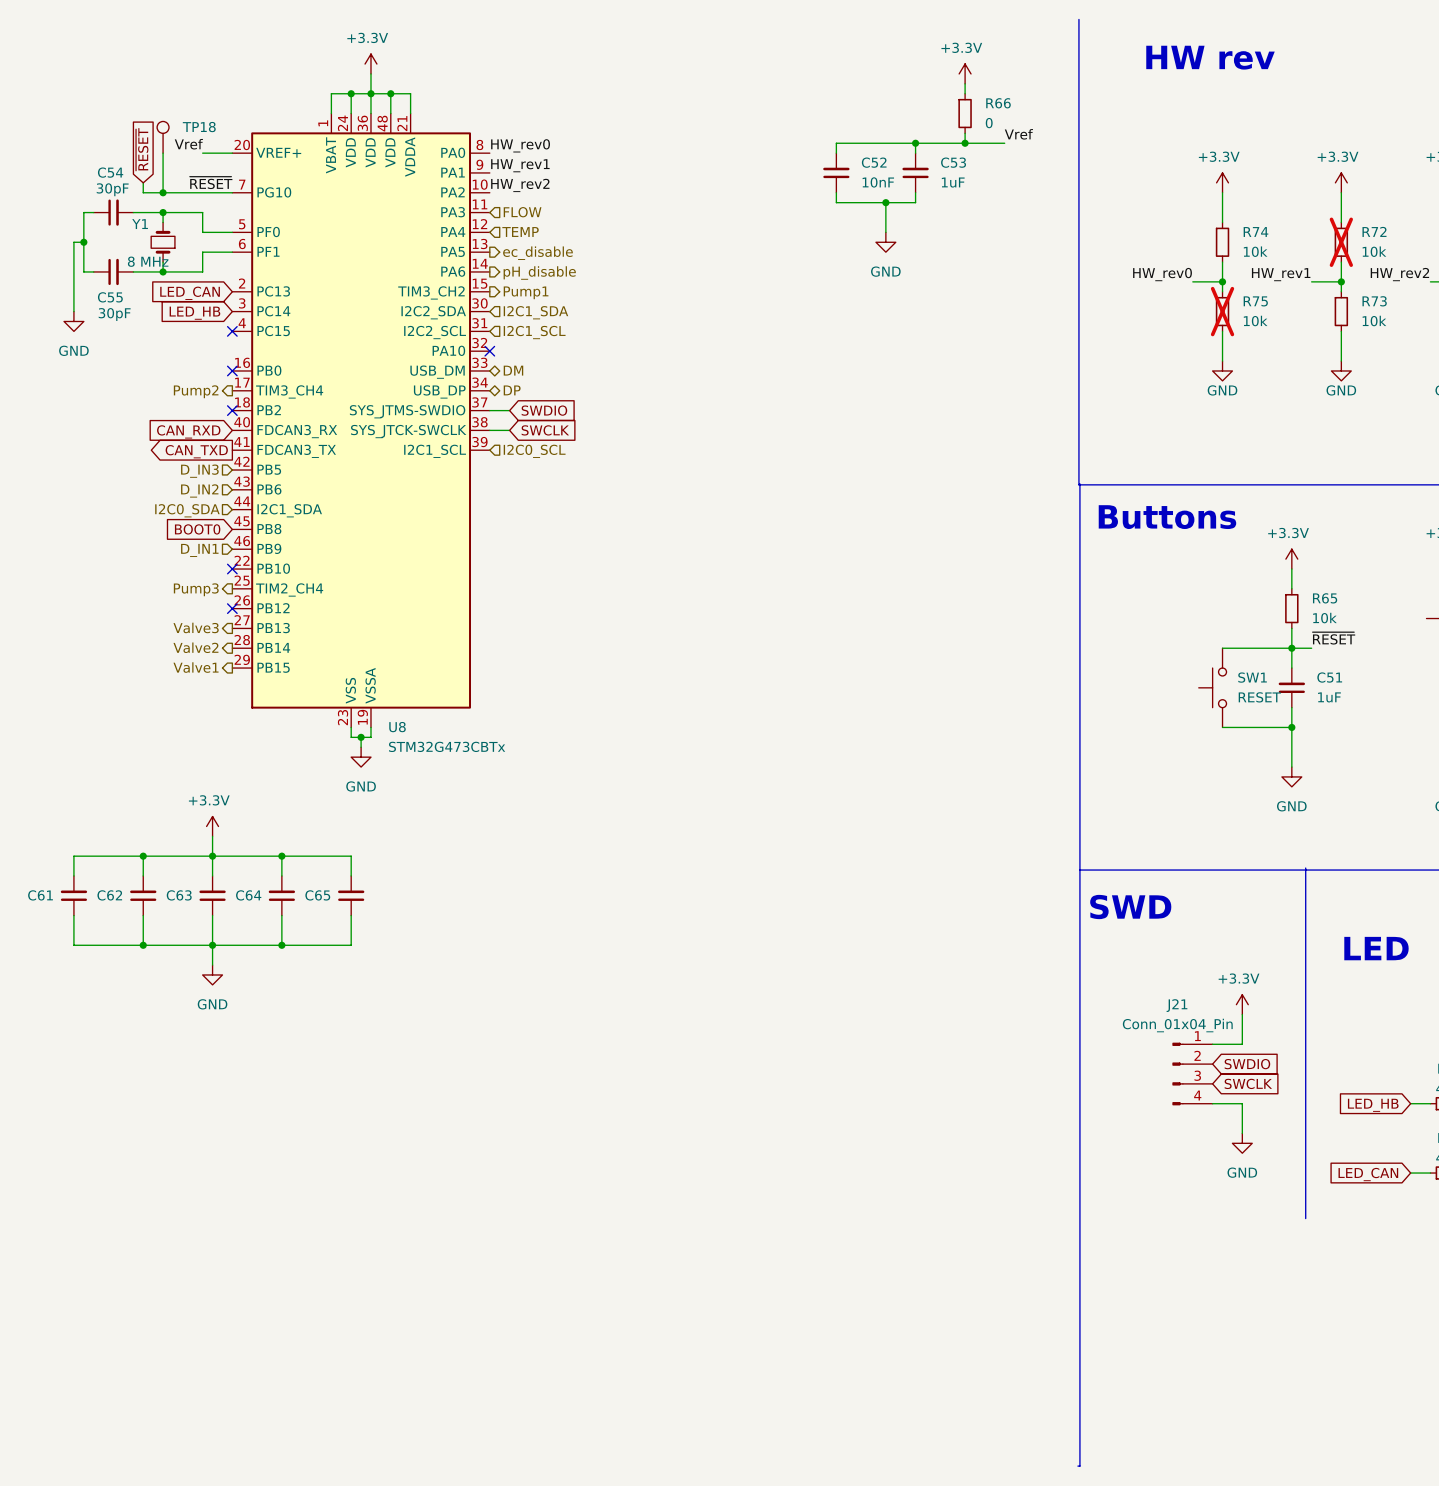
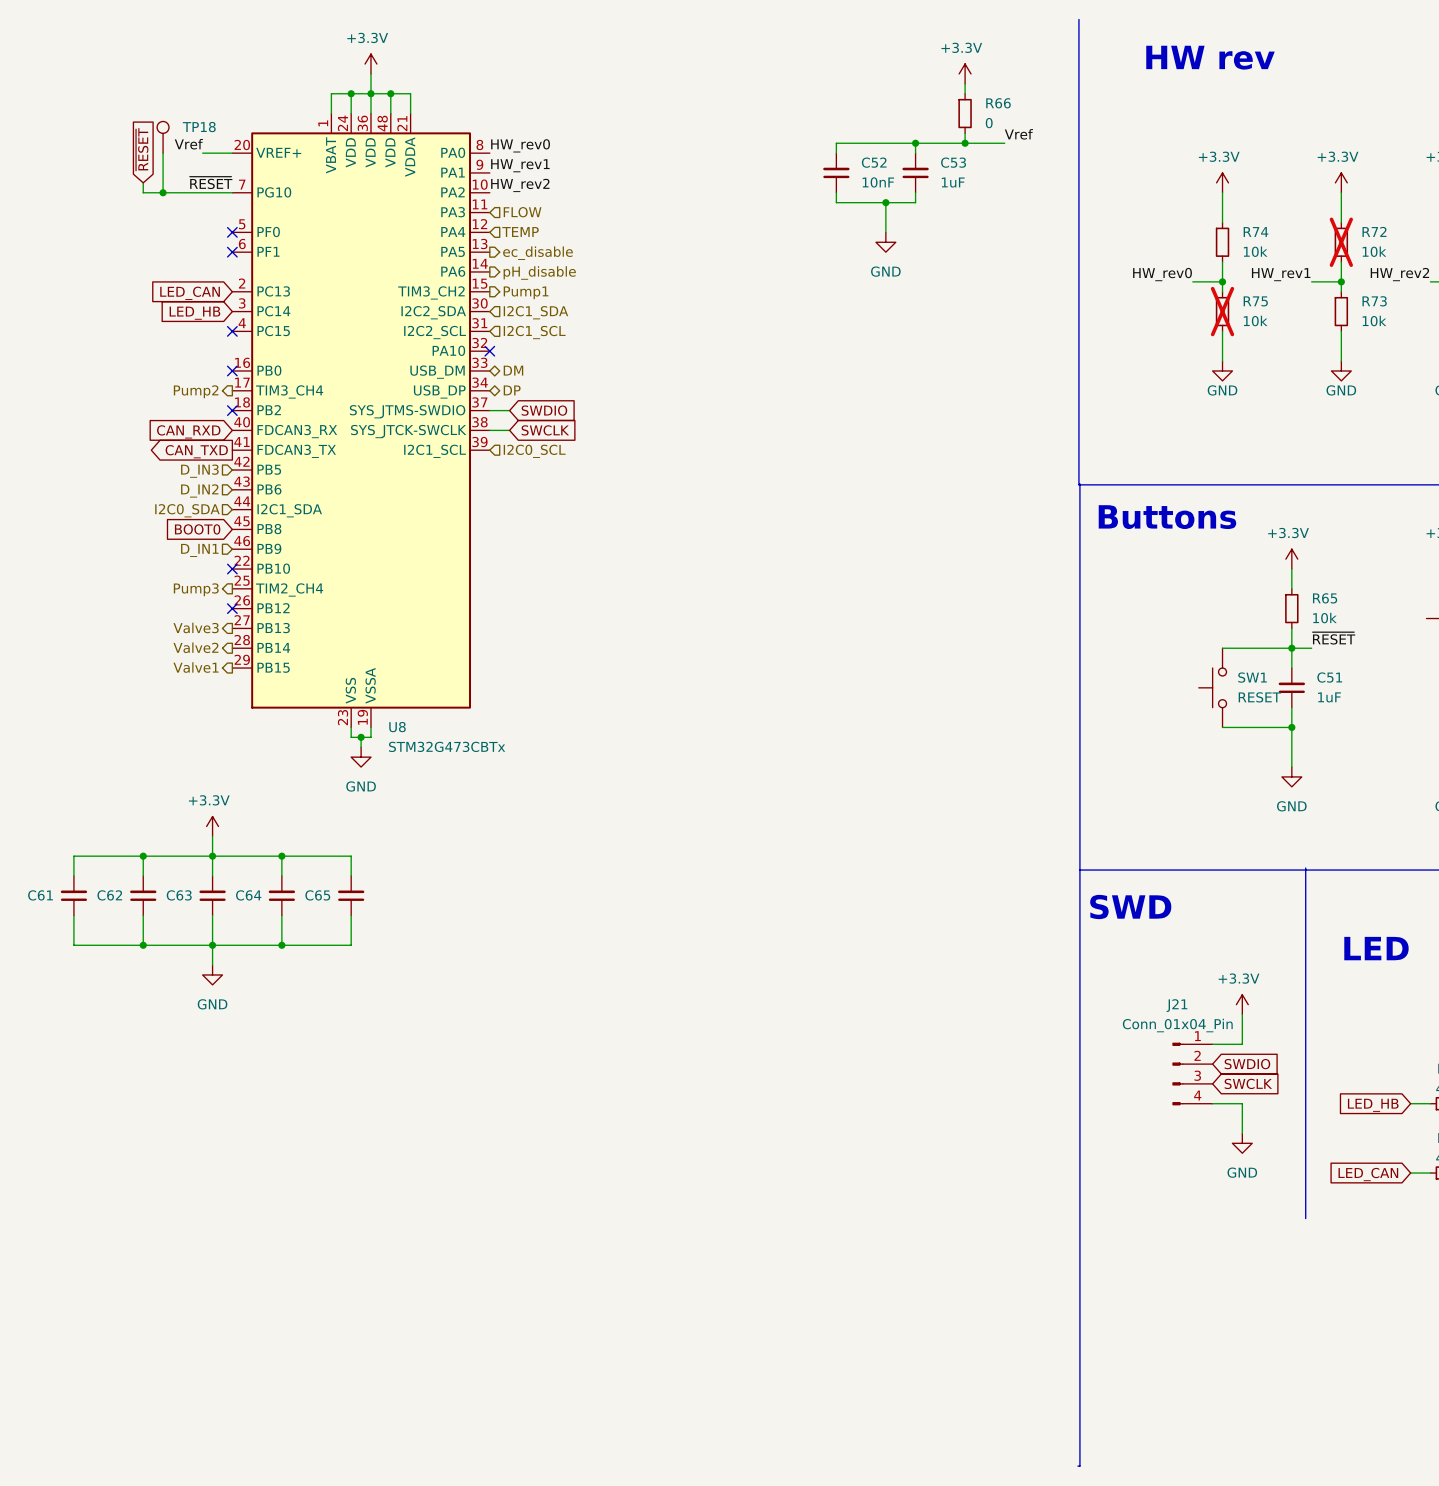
wire: (93, 212) (83, 212) (83, 271) (93, 271) -> none
C54: 30pF (113, 212) -> none
wire: (133, 212) (202, 212) (202, 232) (232, 232) -> none
wire: (163, 212) (163, 222) -> none
junction: (163, 212) -> none
no-connect mark: none -> (232, 232)
wire: (83, 242) (73, 242) (73, 311) -> none
junction: (83, 242) -> none
Y1: 8 MHz (163, 242) -> none
wire: (232, 252) (202, 252) (202, 271) (133, 271) -> none
no-connect mark: none -> (232, 252)
wire: (163, 262) (163, 271) -> none
C55: 30pF (113, 271) -> none
junction: (163, 271) -> none
power symbol: GND (73, 321) -> none

